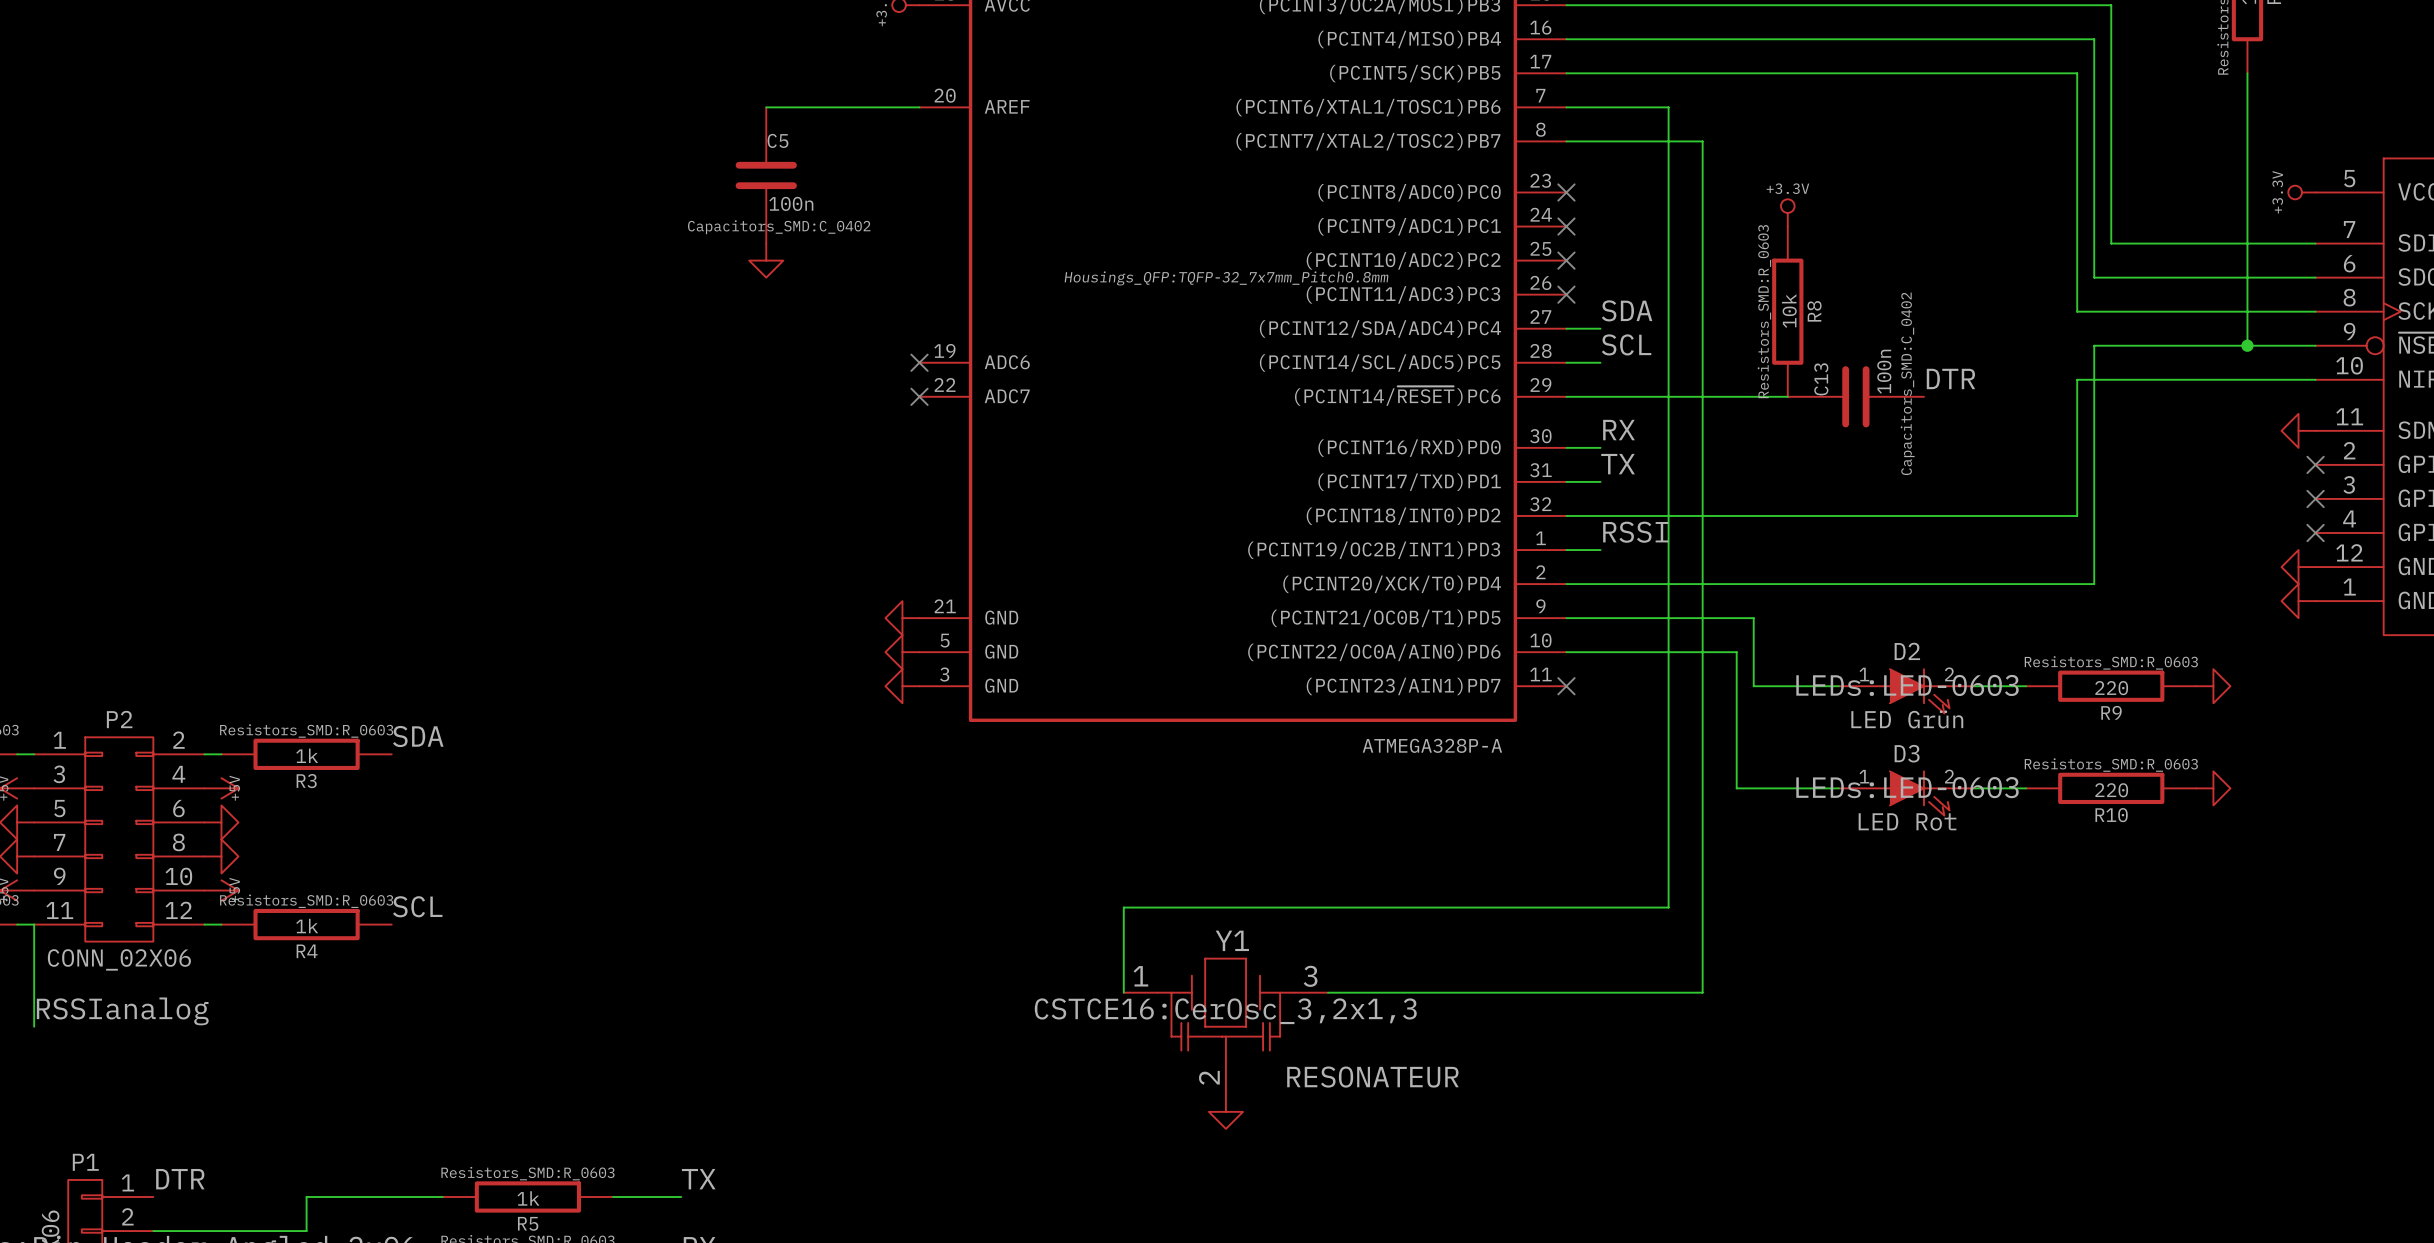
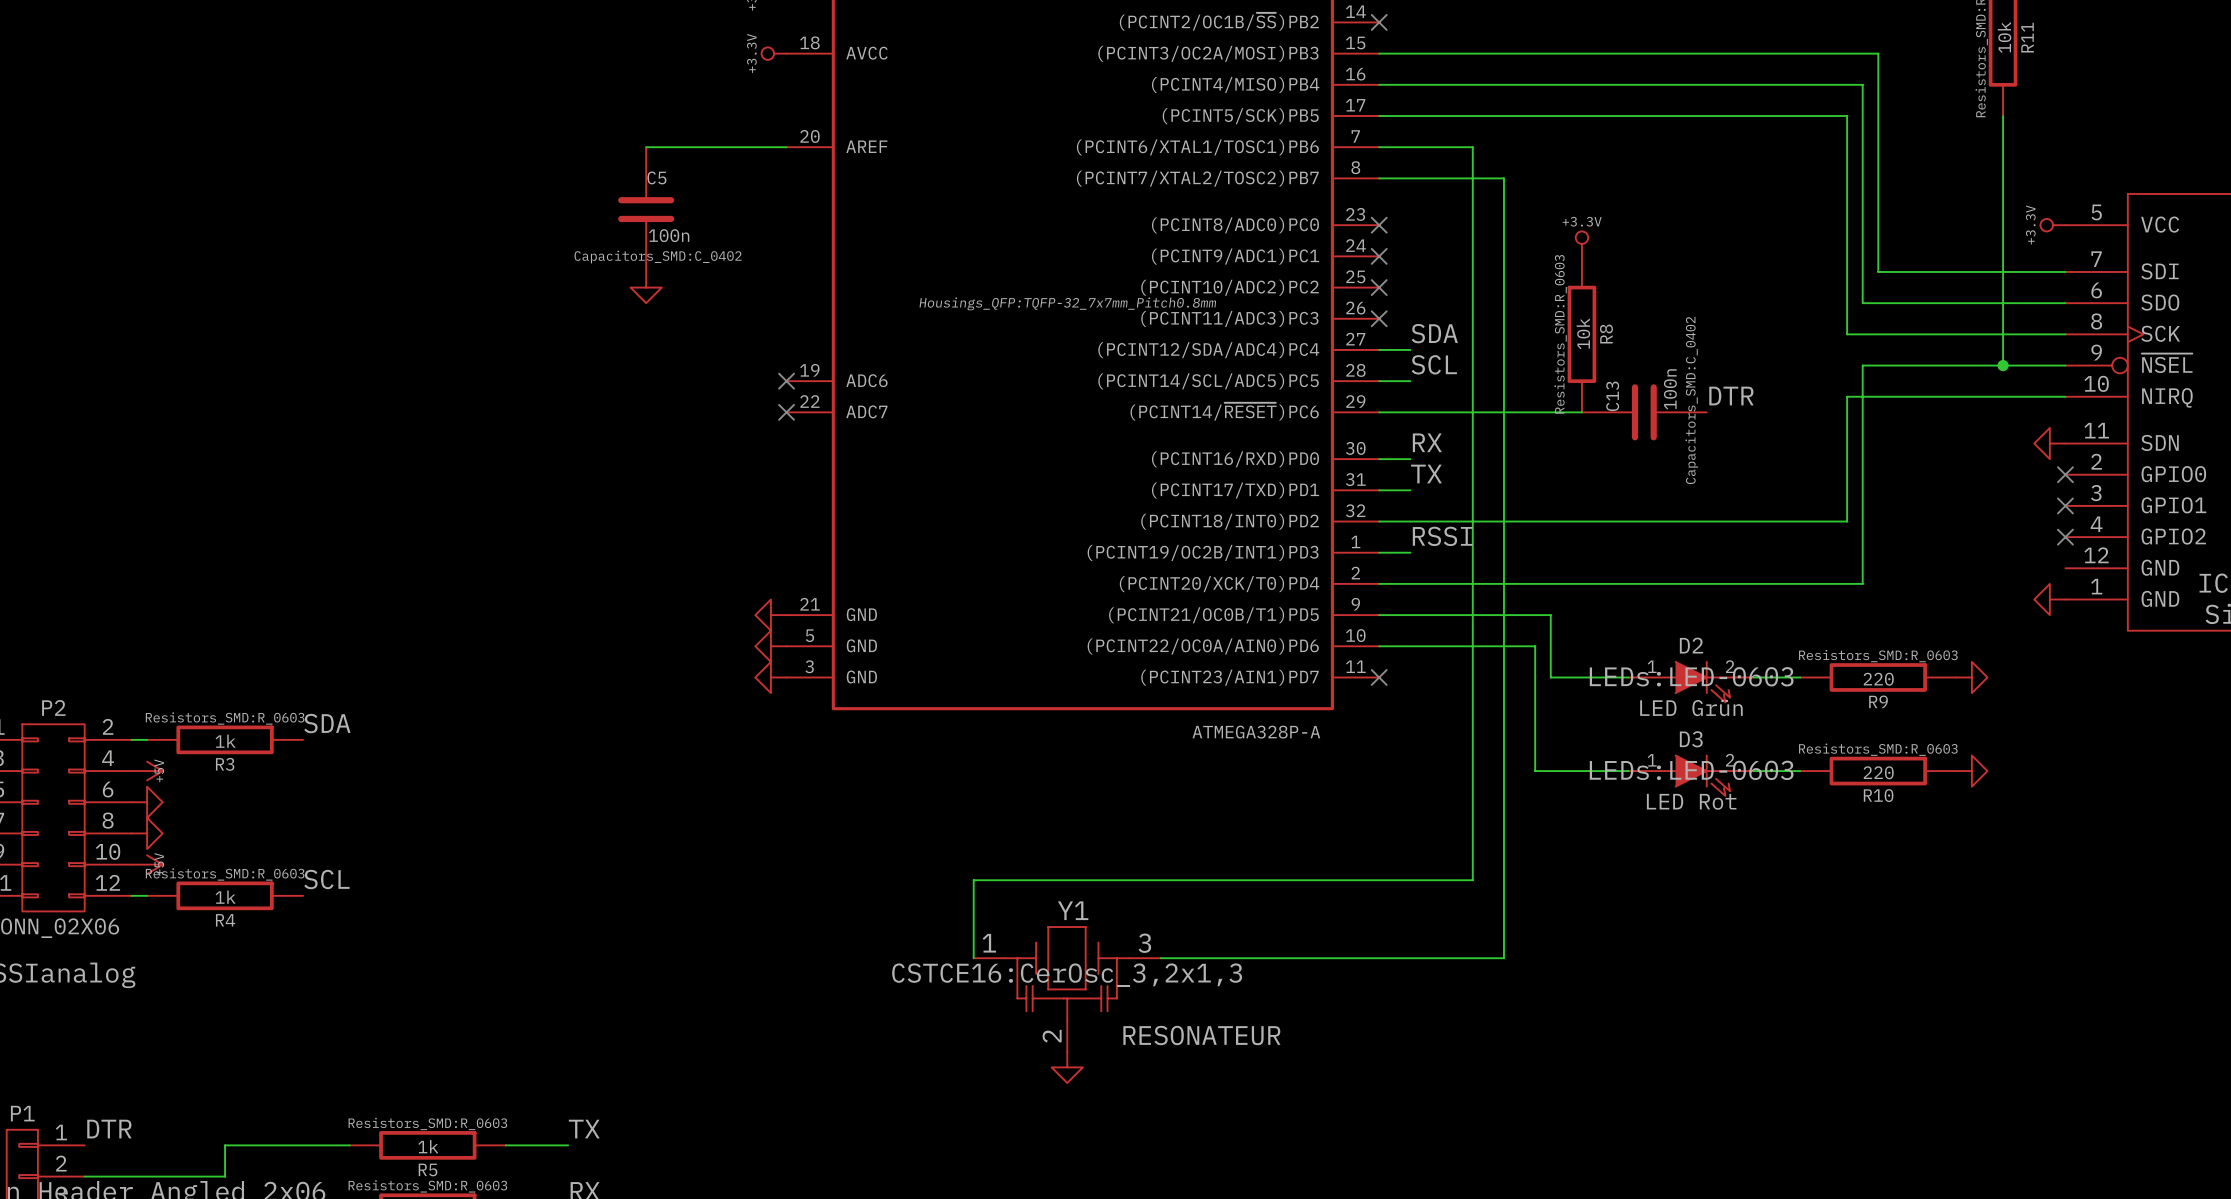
power symbol: (2298, 567) -> none

